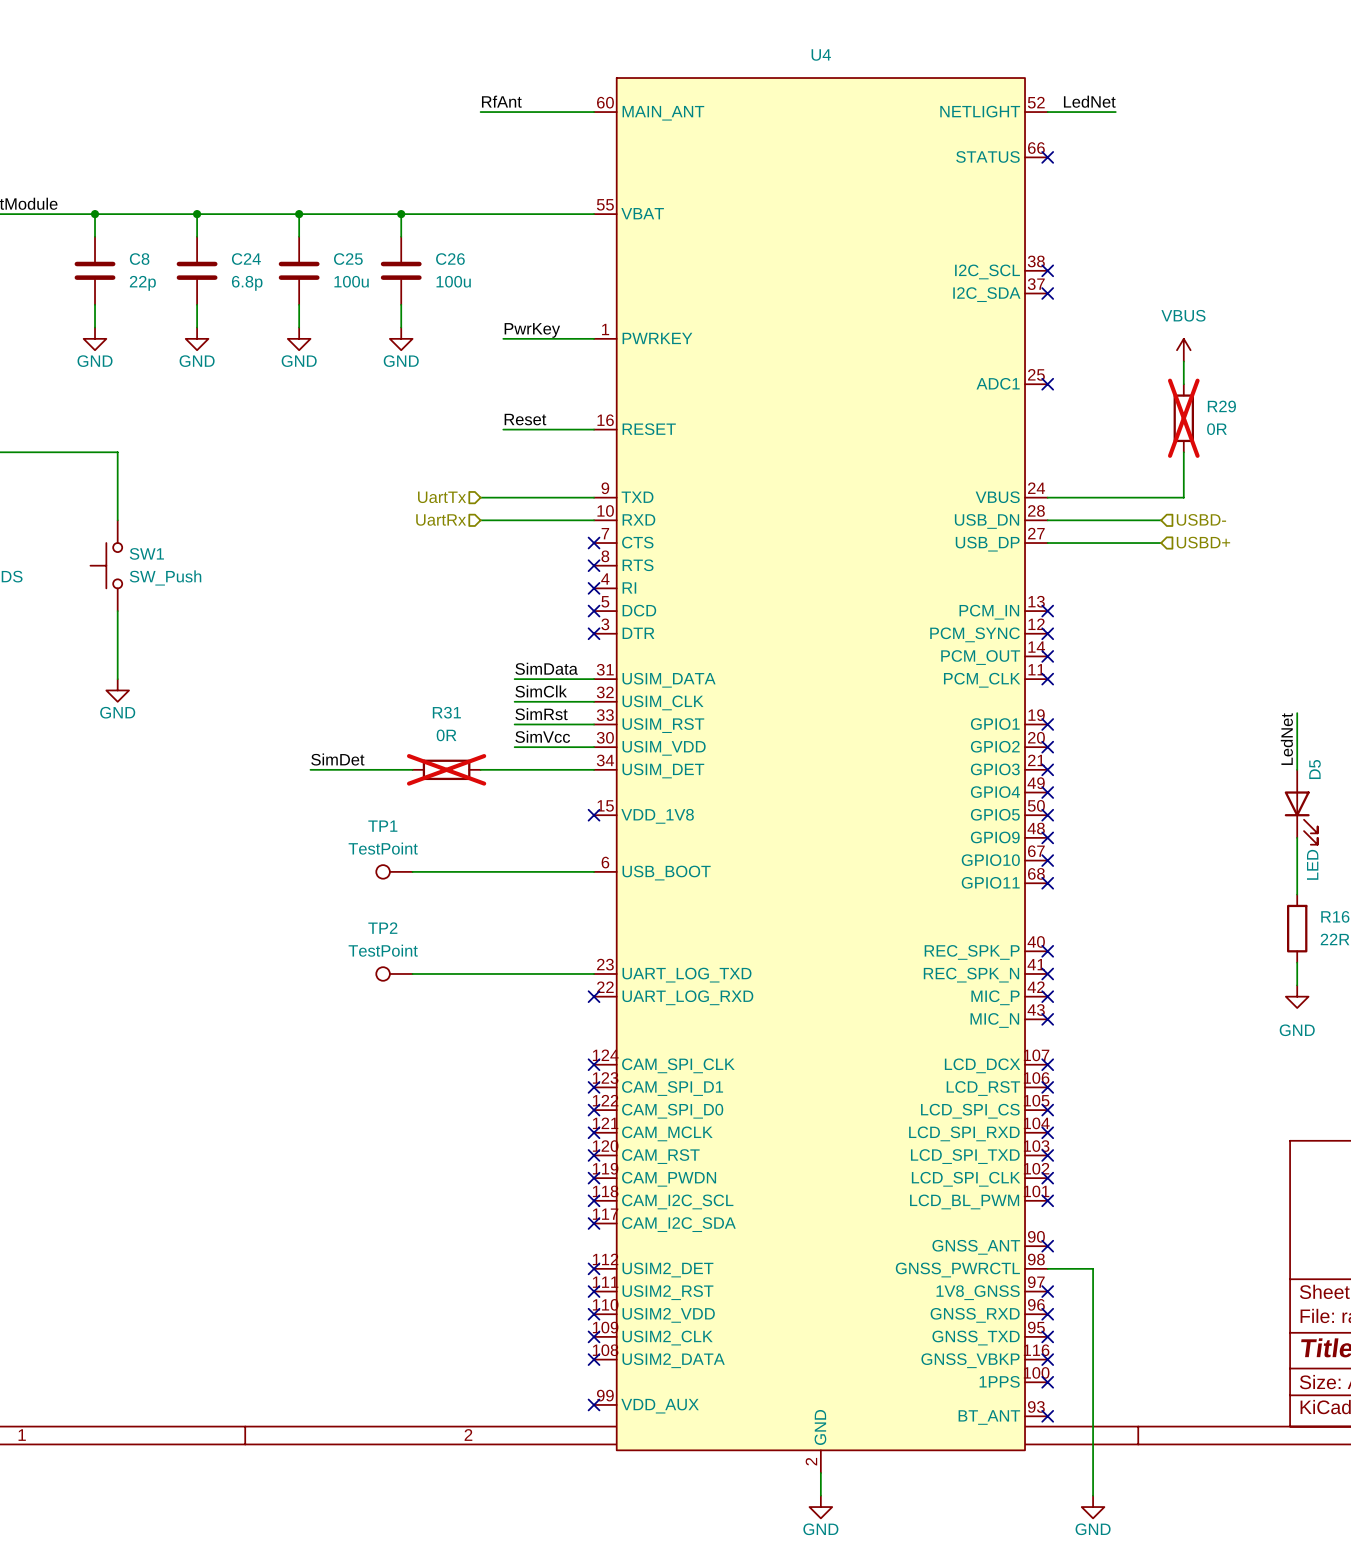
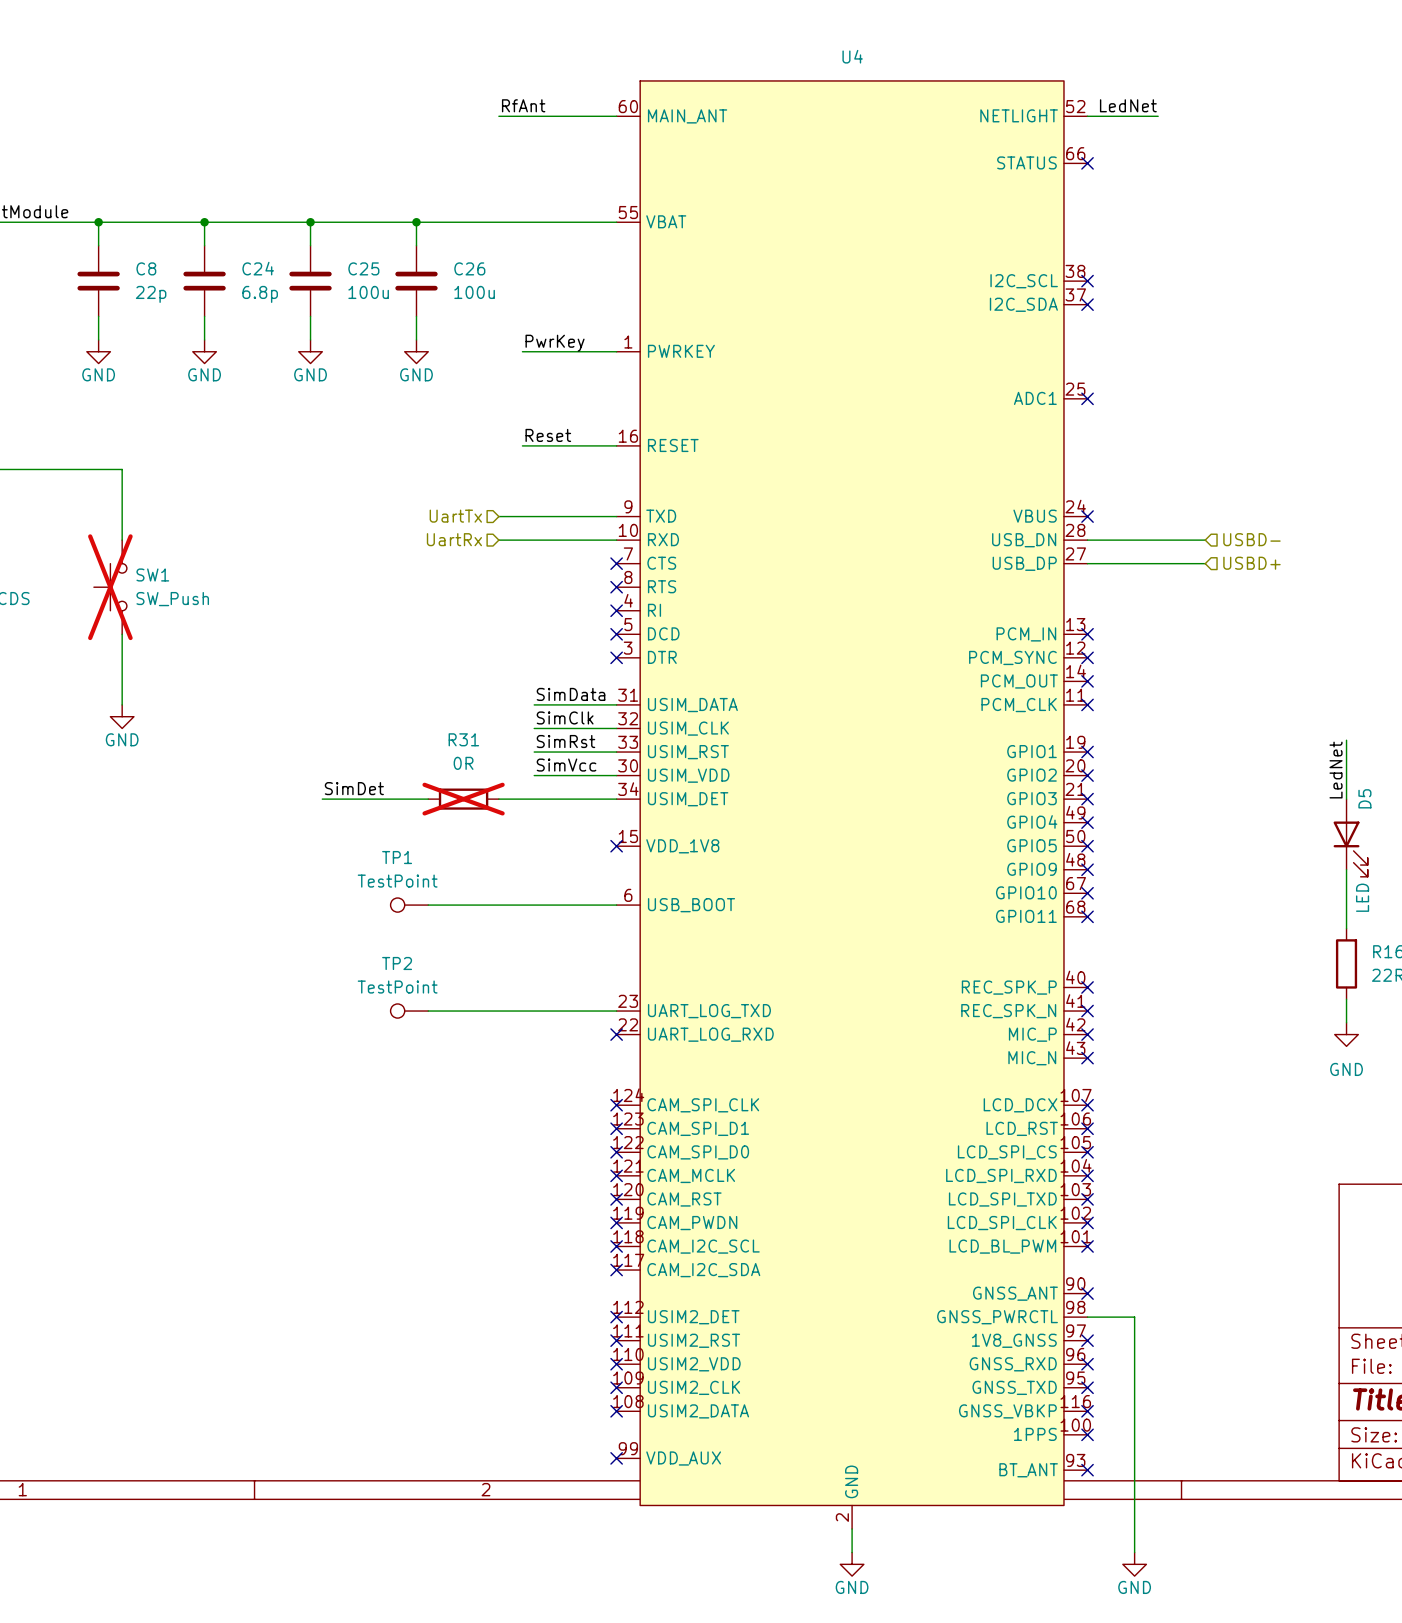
power symbol: VBUS (1183, 350) -> none
wire: (1183, 361) (1183, 384) -> none
R29: 0R (1183, 418) -> none
wire: (1183, 452) (1183, 497) (1047, 497) -> none
no-connect mark: none -> (1087, 516)
SW1 do-not-place cross: none -> (110, 587)

